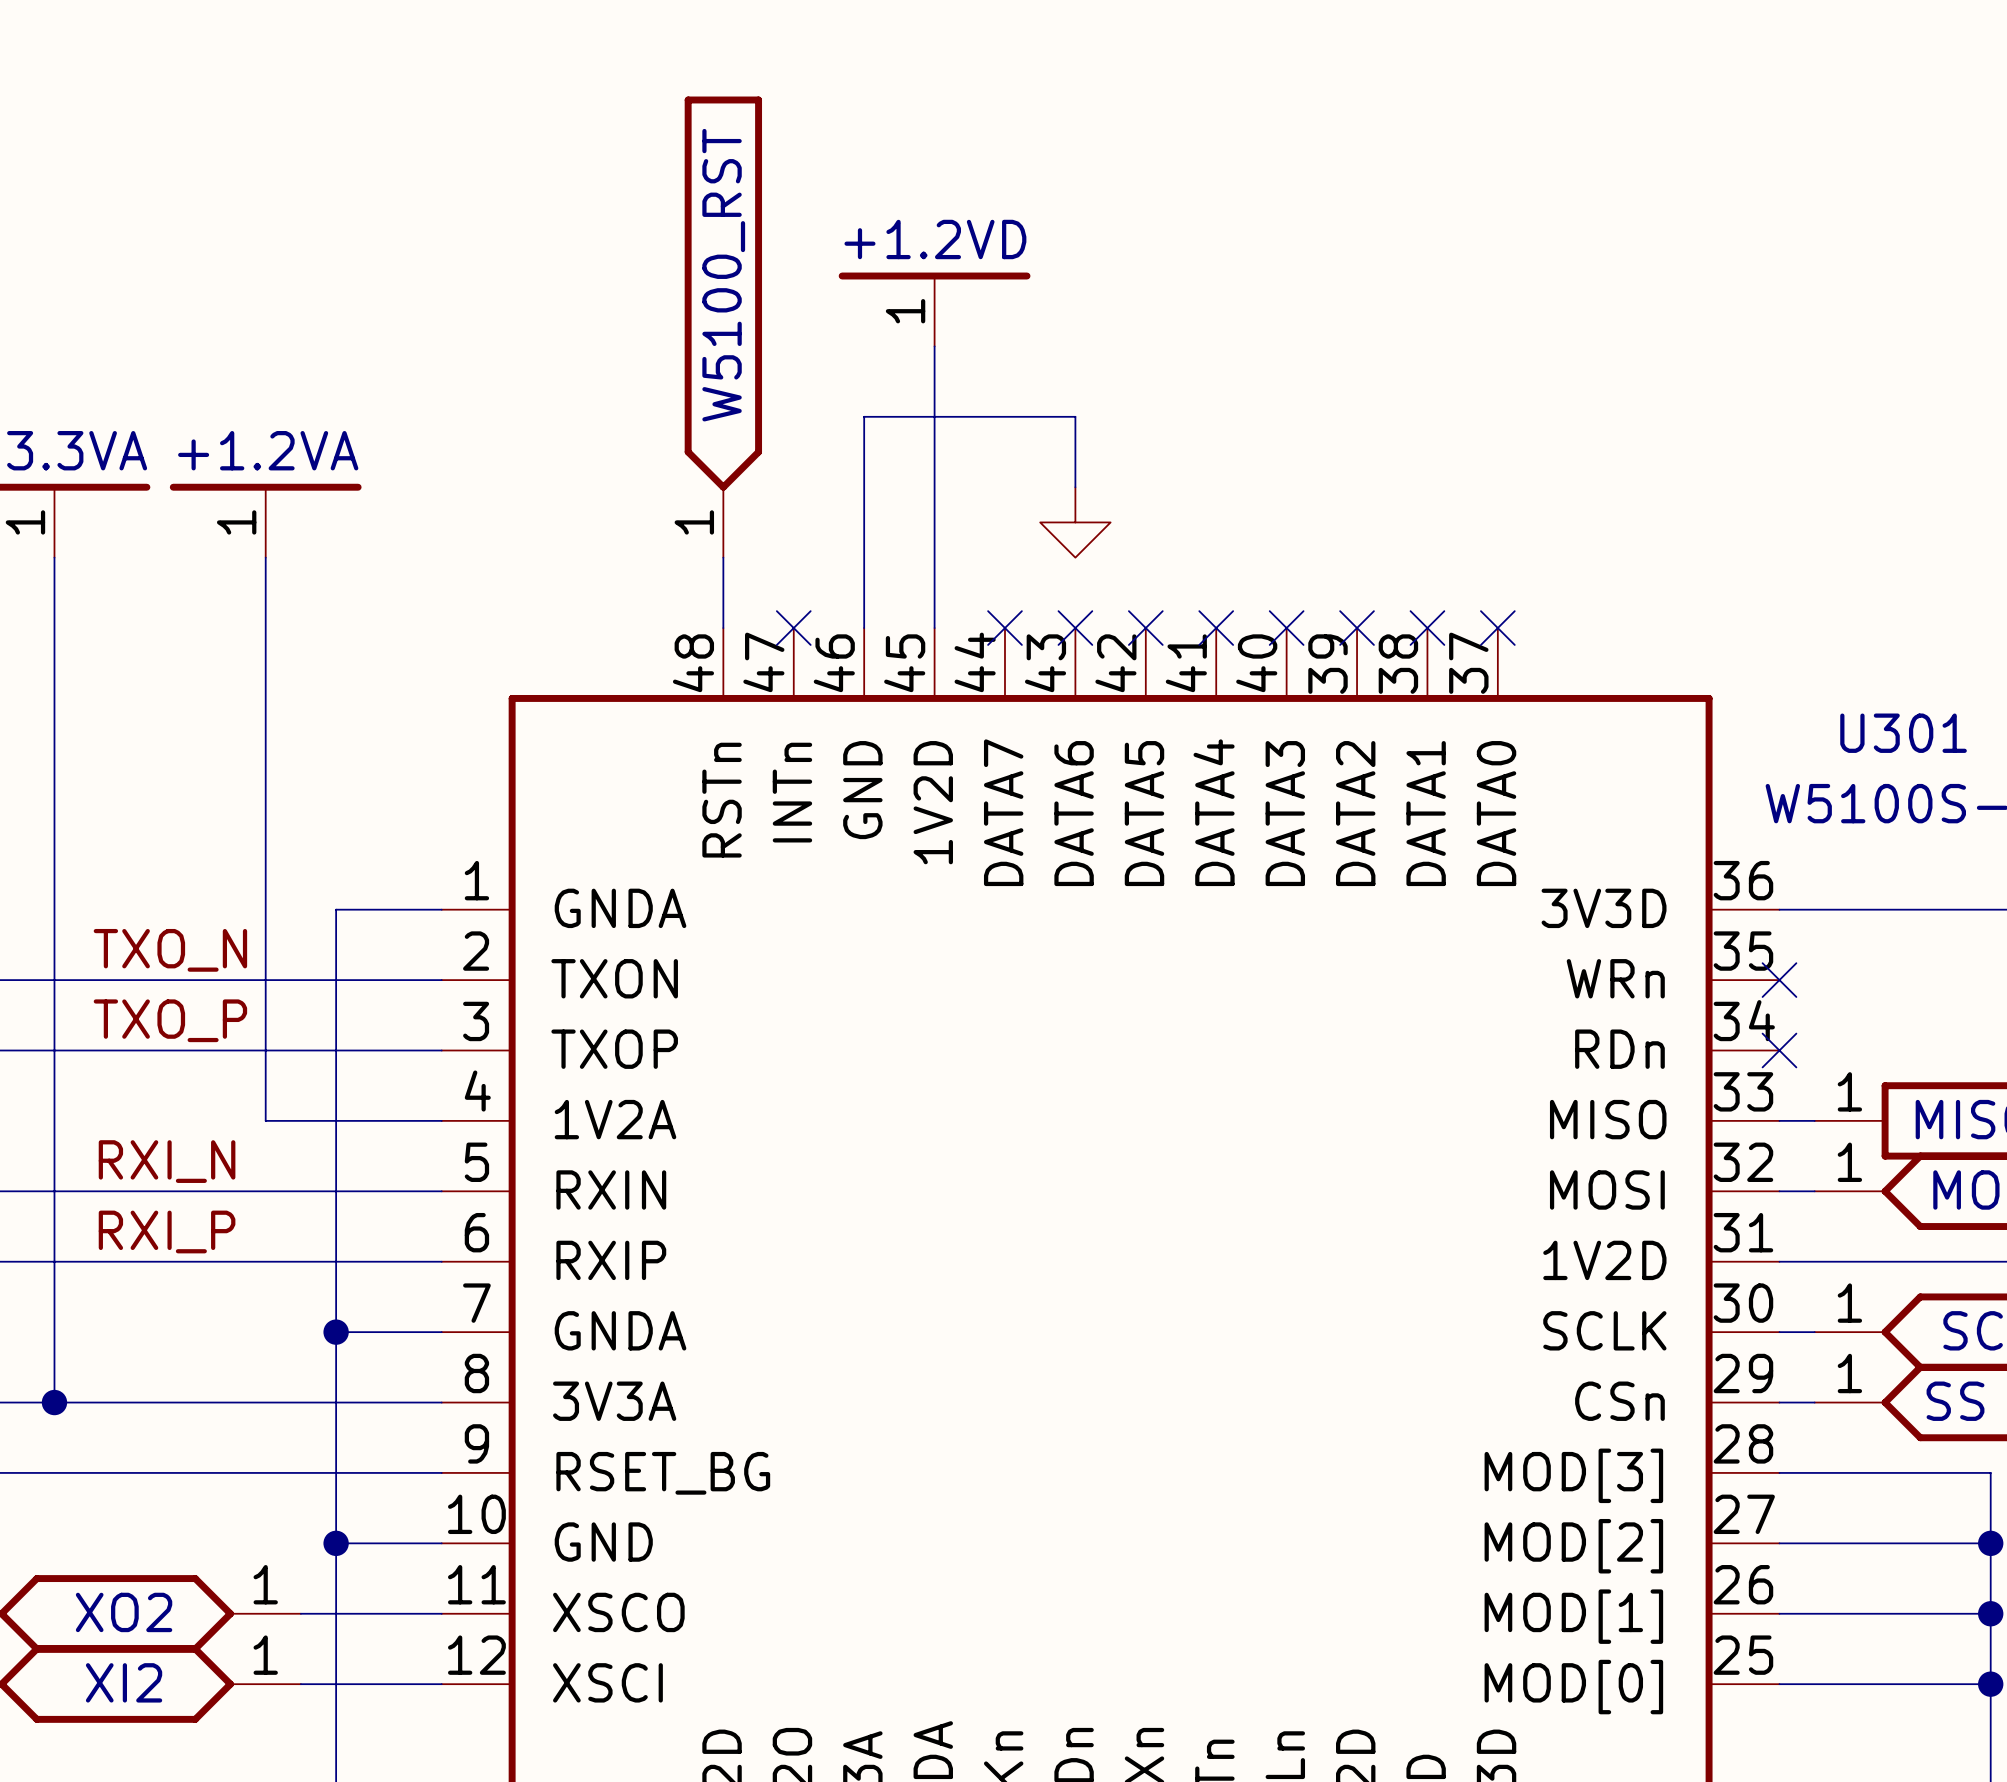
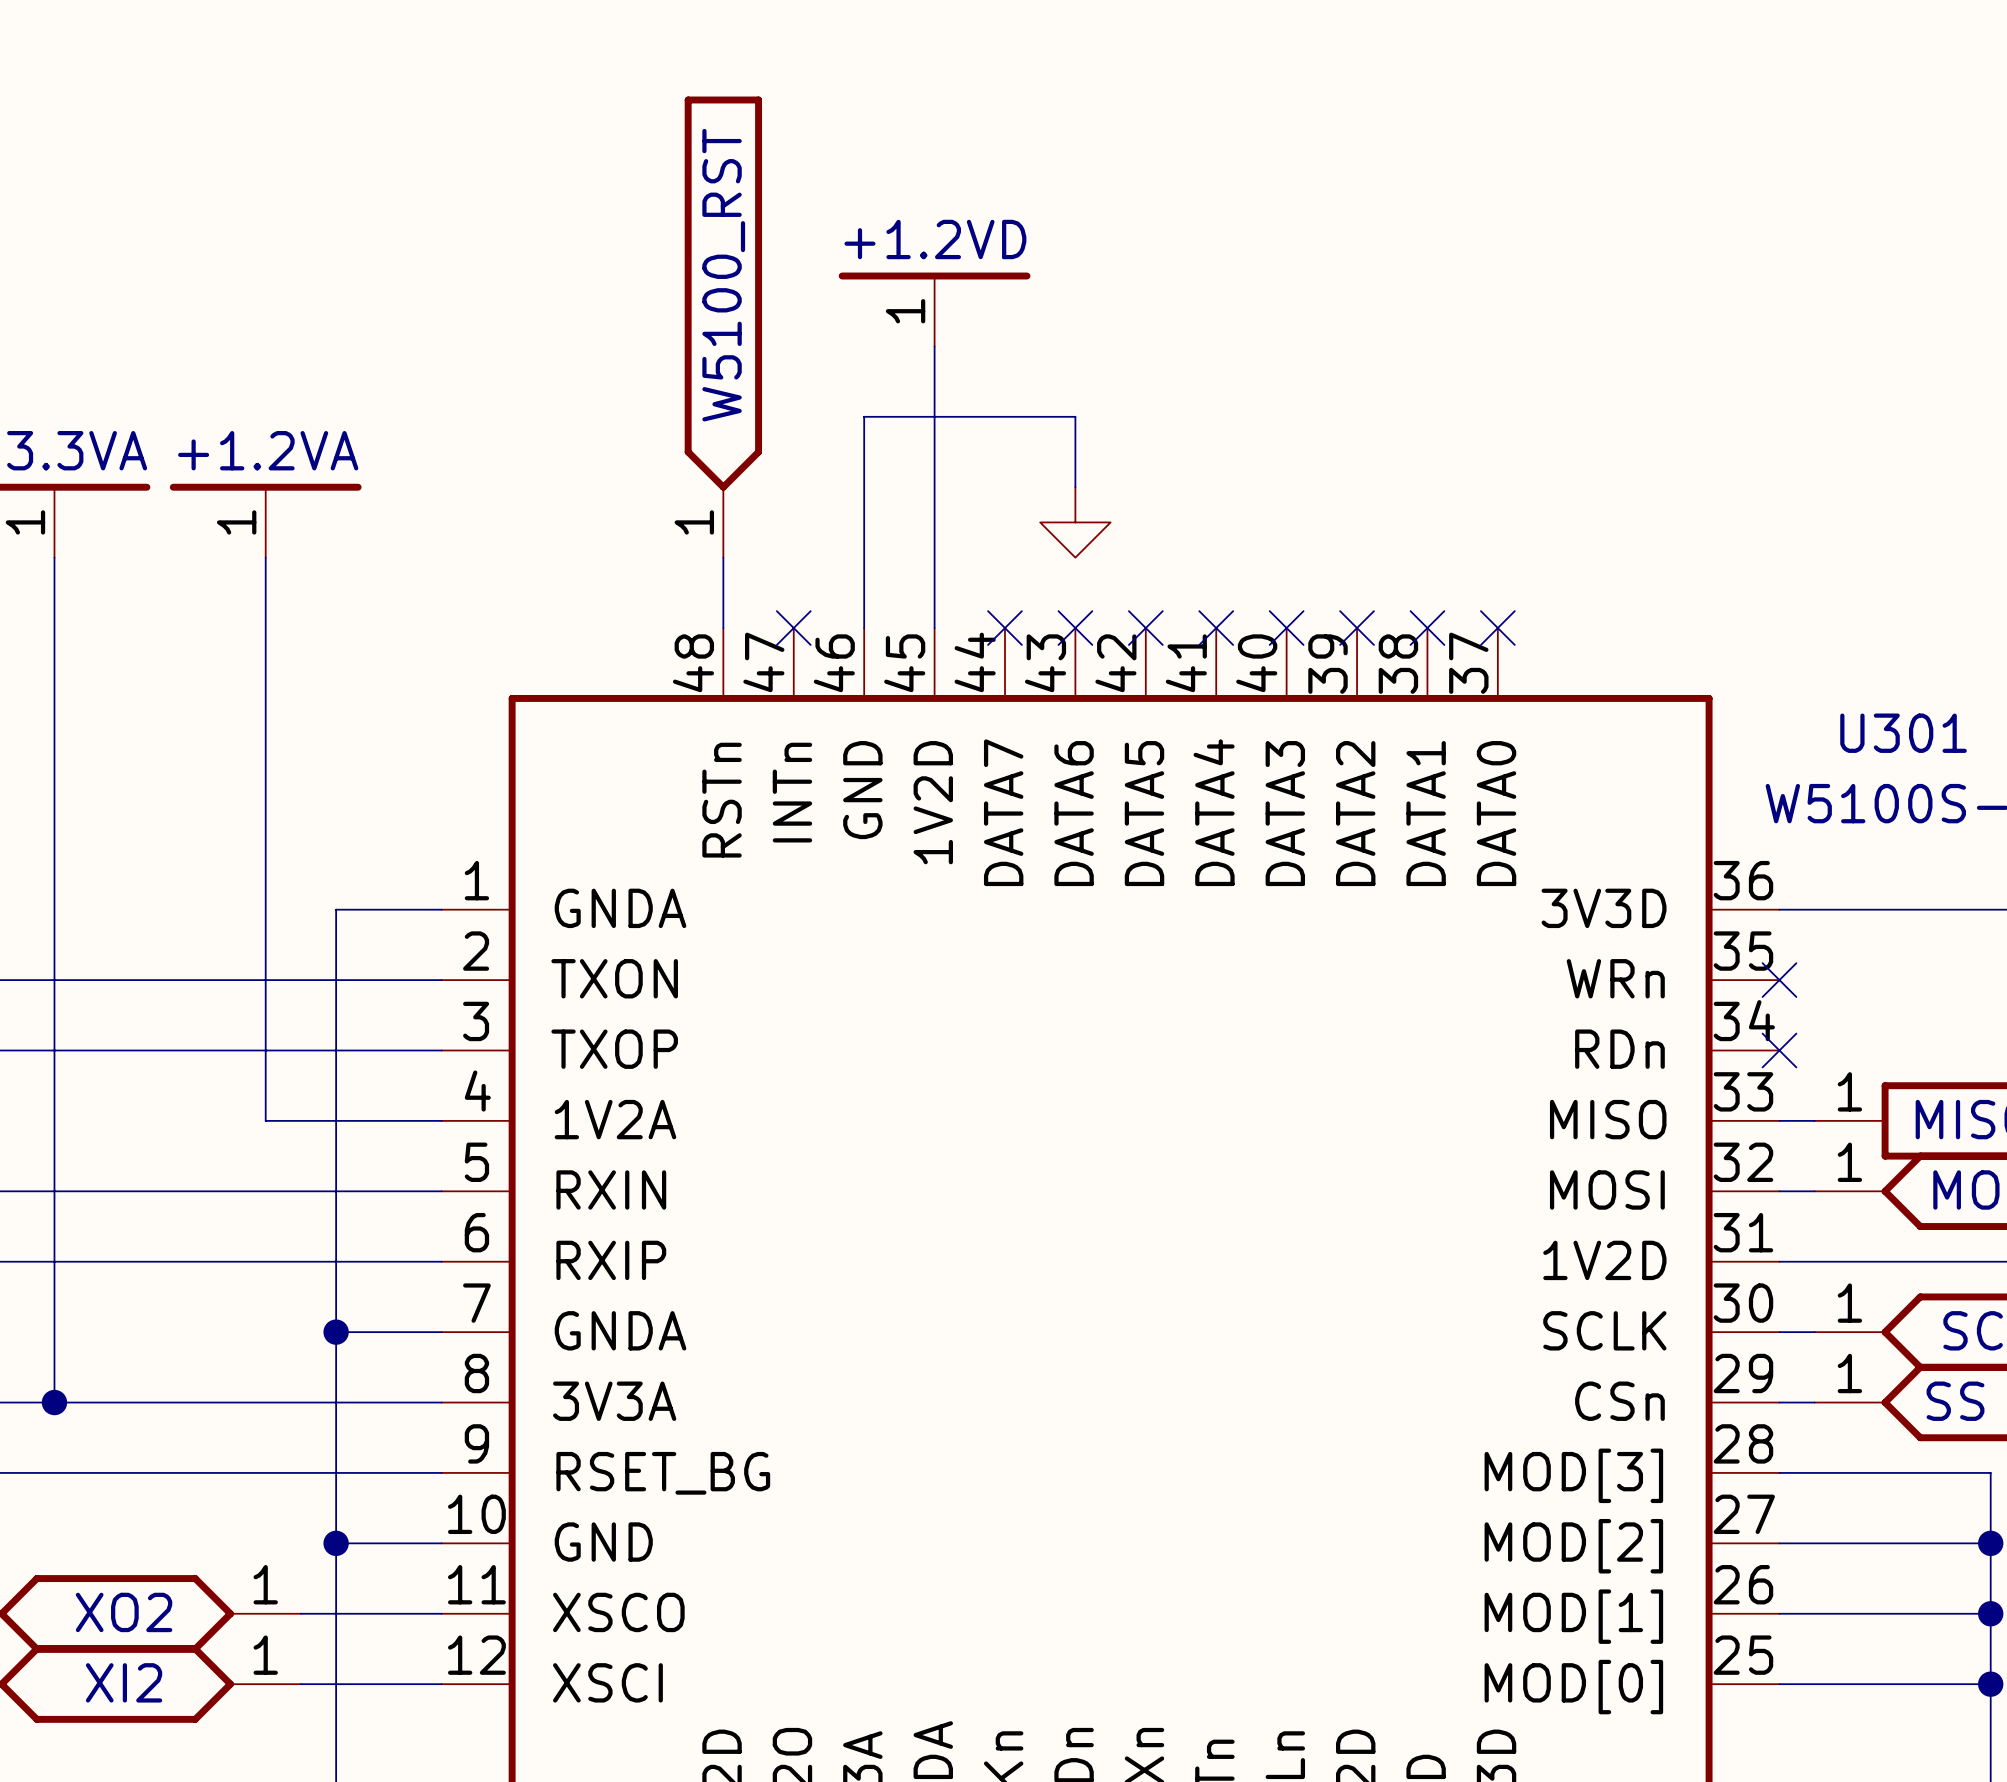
label: TXO_N (170, 950) -> none
label: TXO_P (170, 1020) -> none
label: RXI_N (167, 1161) -> none
label: RXI_P (167, 1231) -> none

